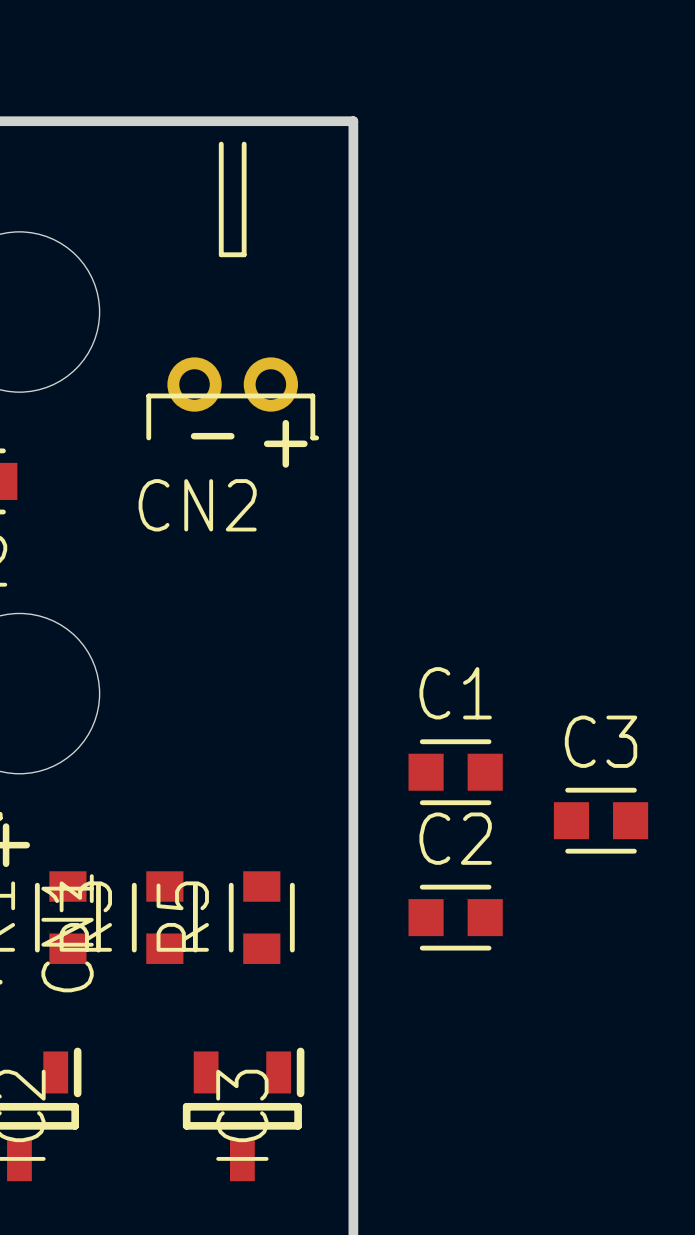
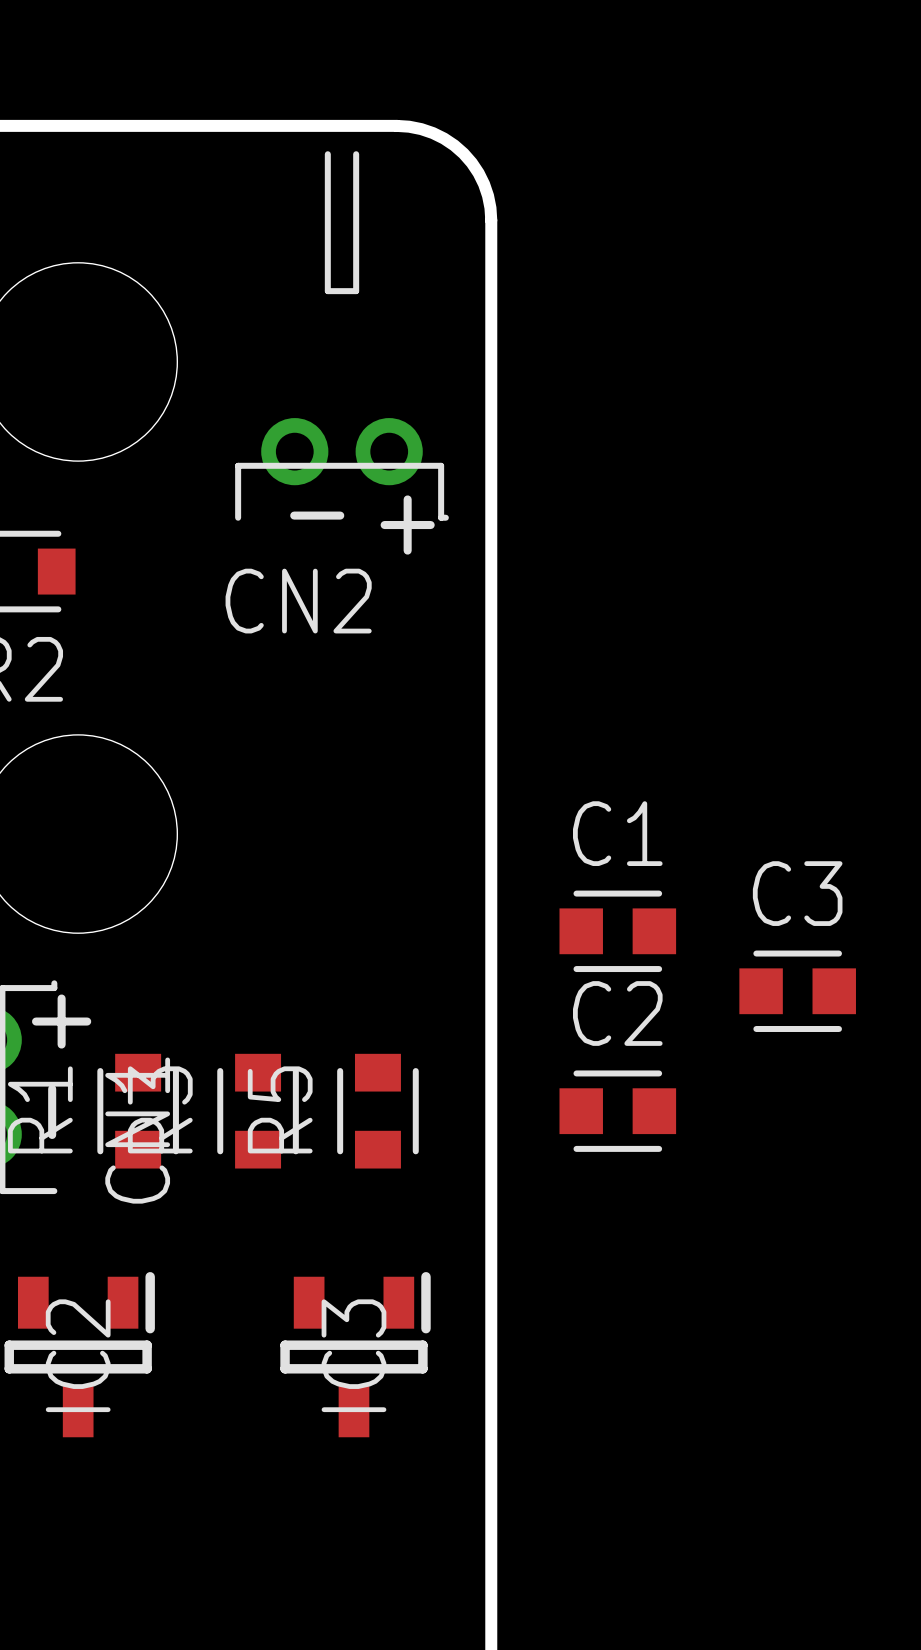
board edge: (277, 121) (353, 121) (353, 197) -> (396, 125) (421, 129) (432, 133) (444, 138) (463, 153) (478, 173) (484, 184) (488, 195) (491, 220)

